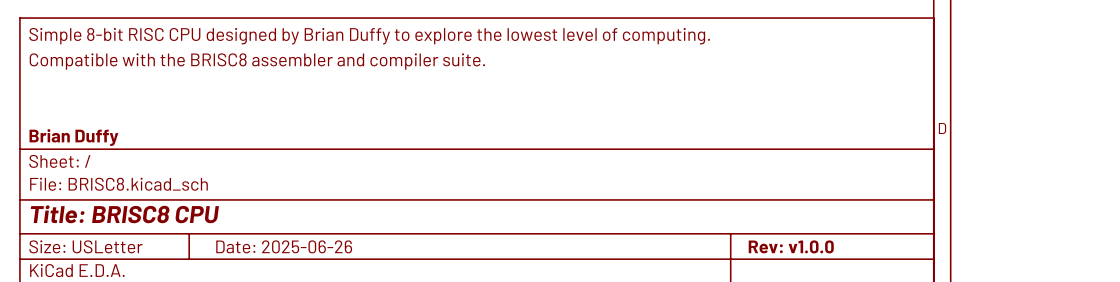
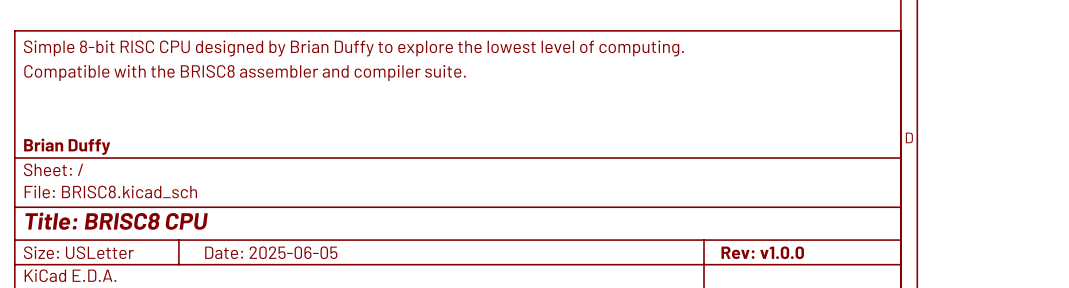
title block: Date: 2025-06-26 (284, 246) -> Date: 2025-06-05 (271, 252)

